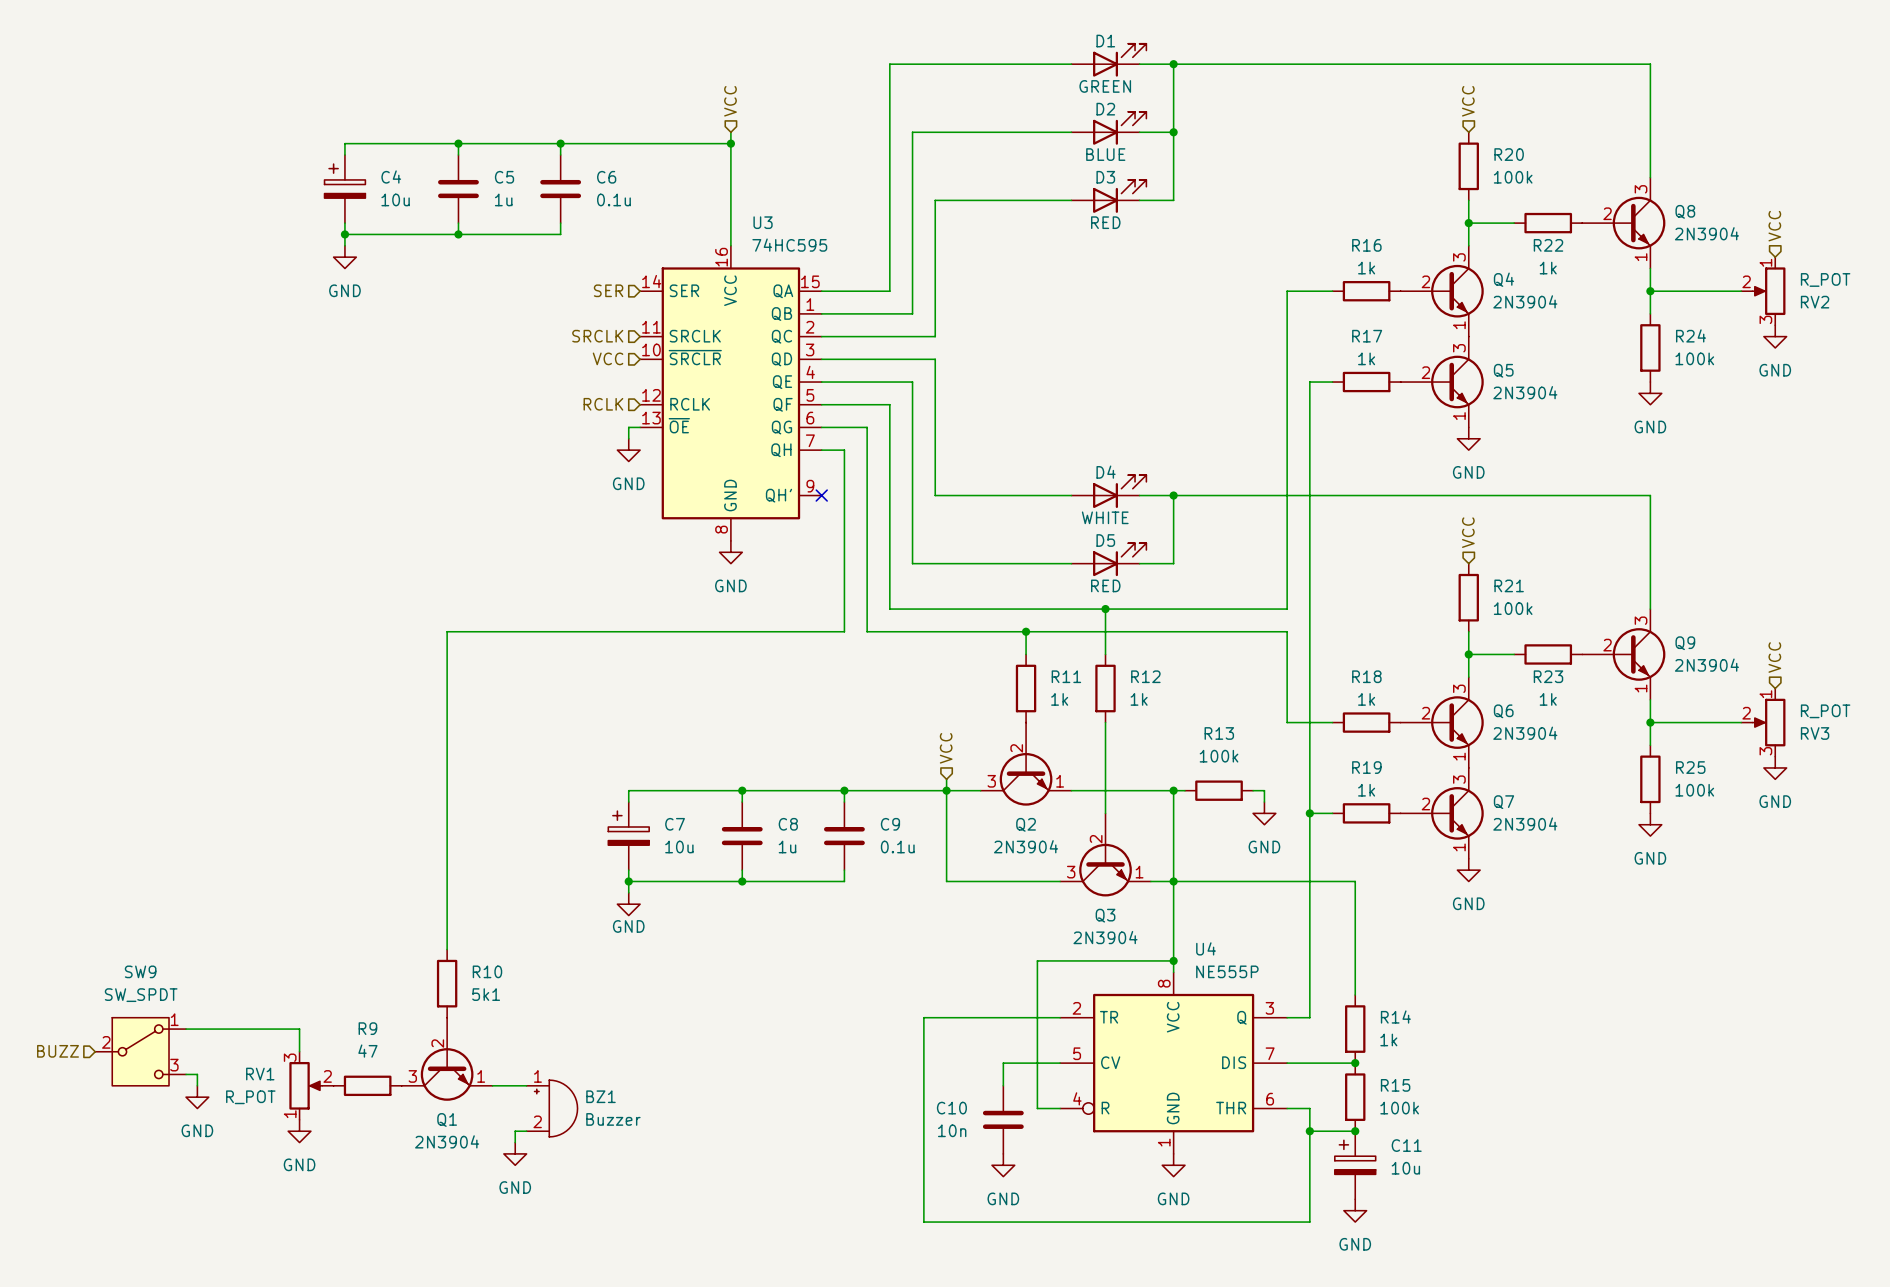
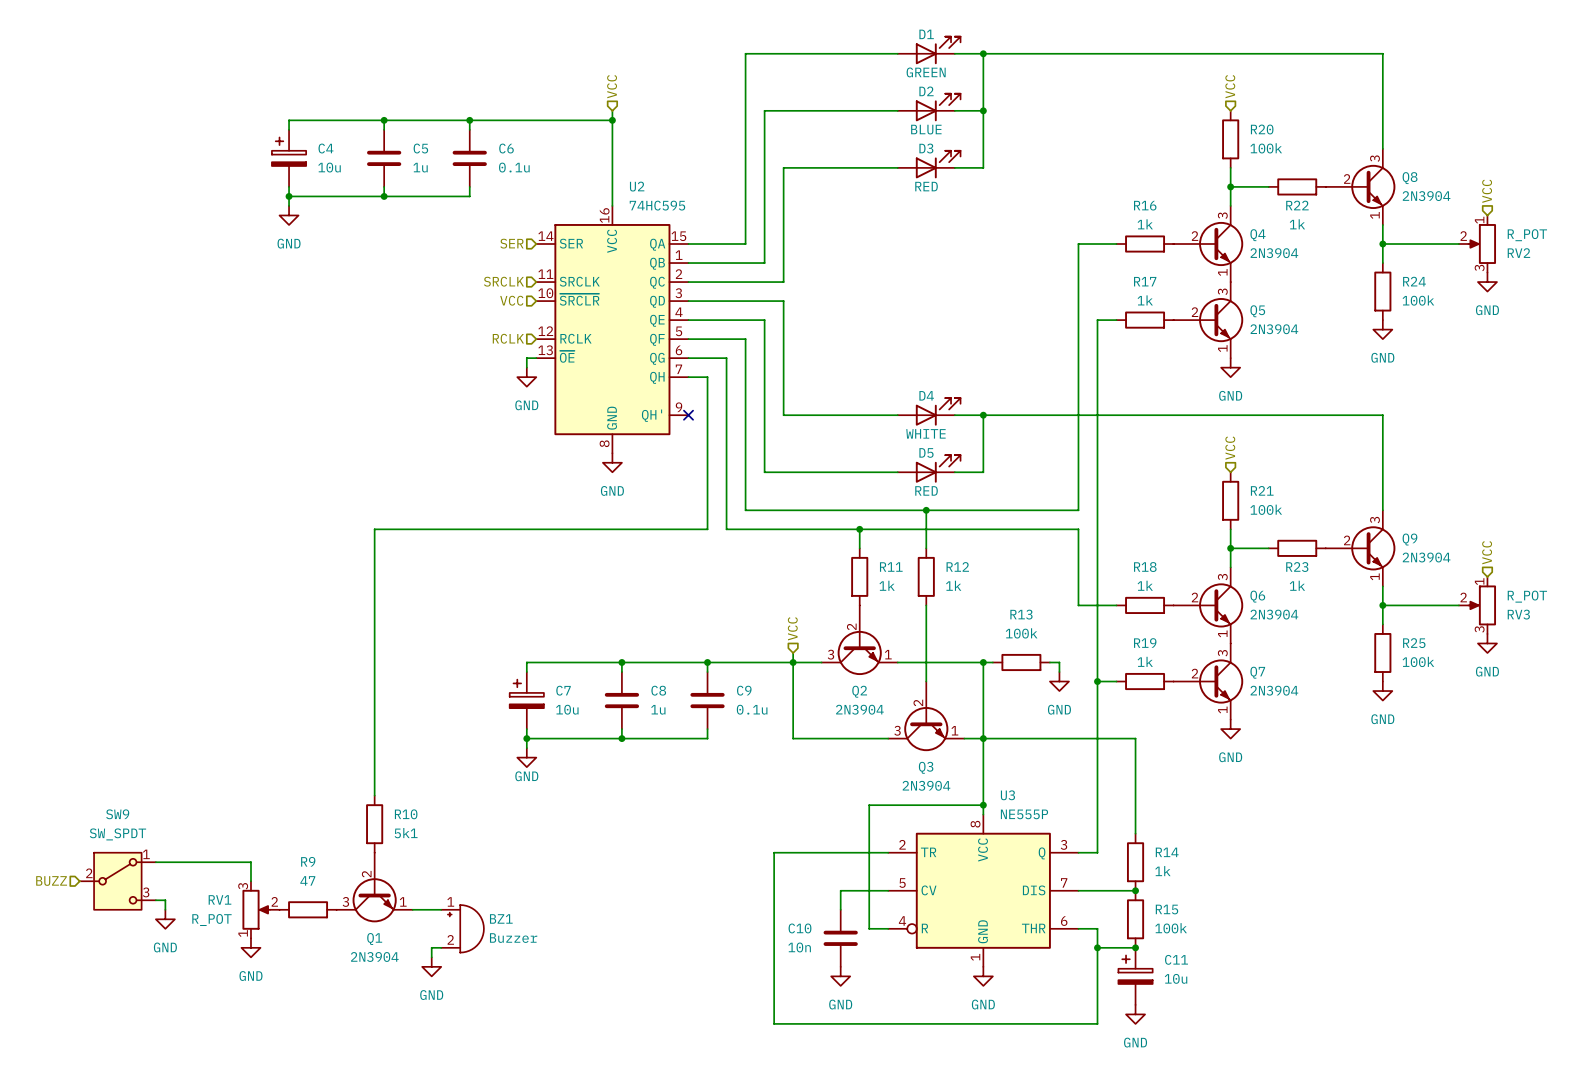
U3 name: U3 (763, 222) -> U2 (637, 186)
U4 name: U4 (1206, 948) -> U3 (1007, 795)

